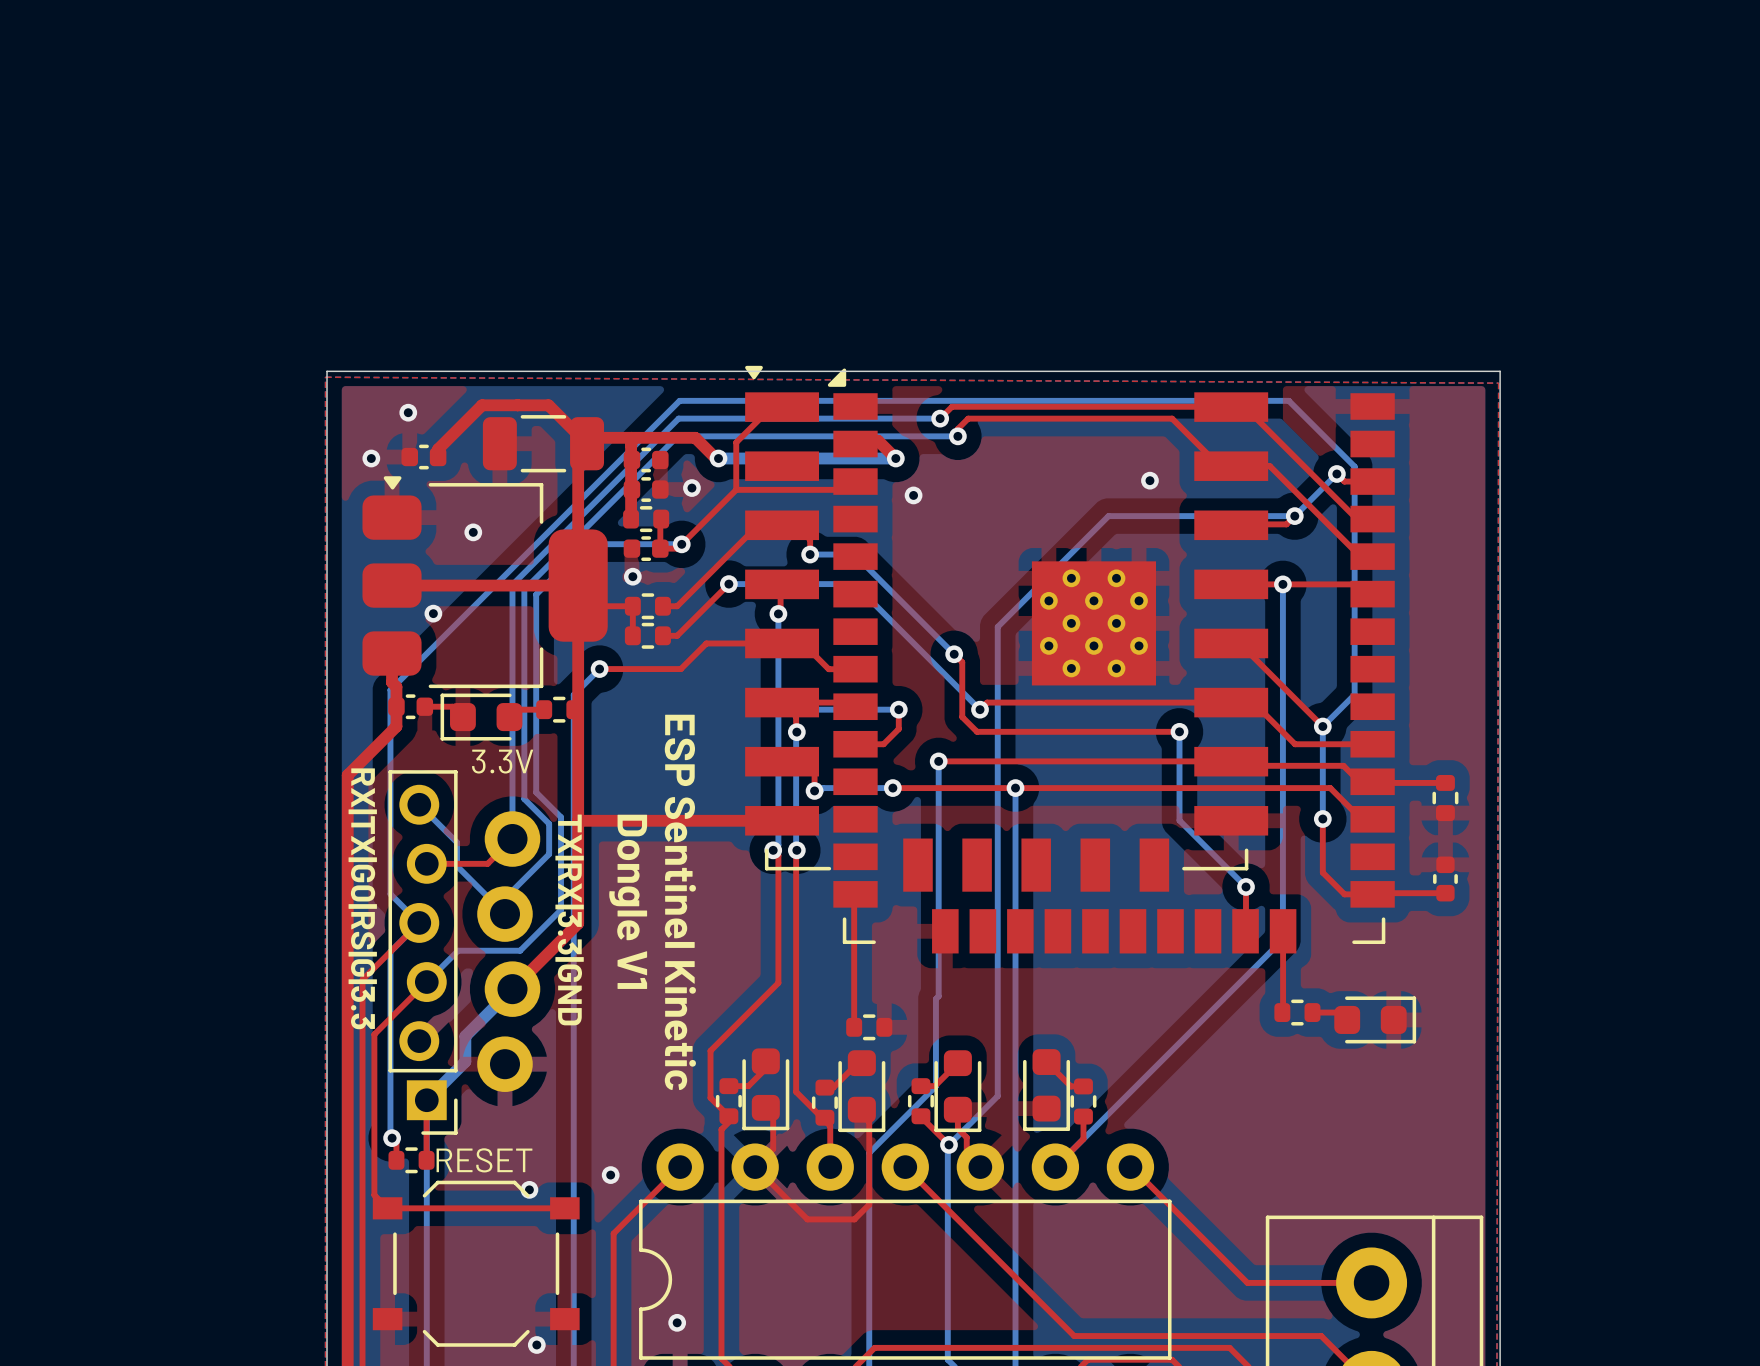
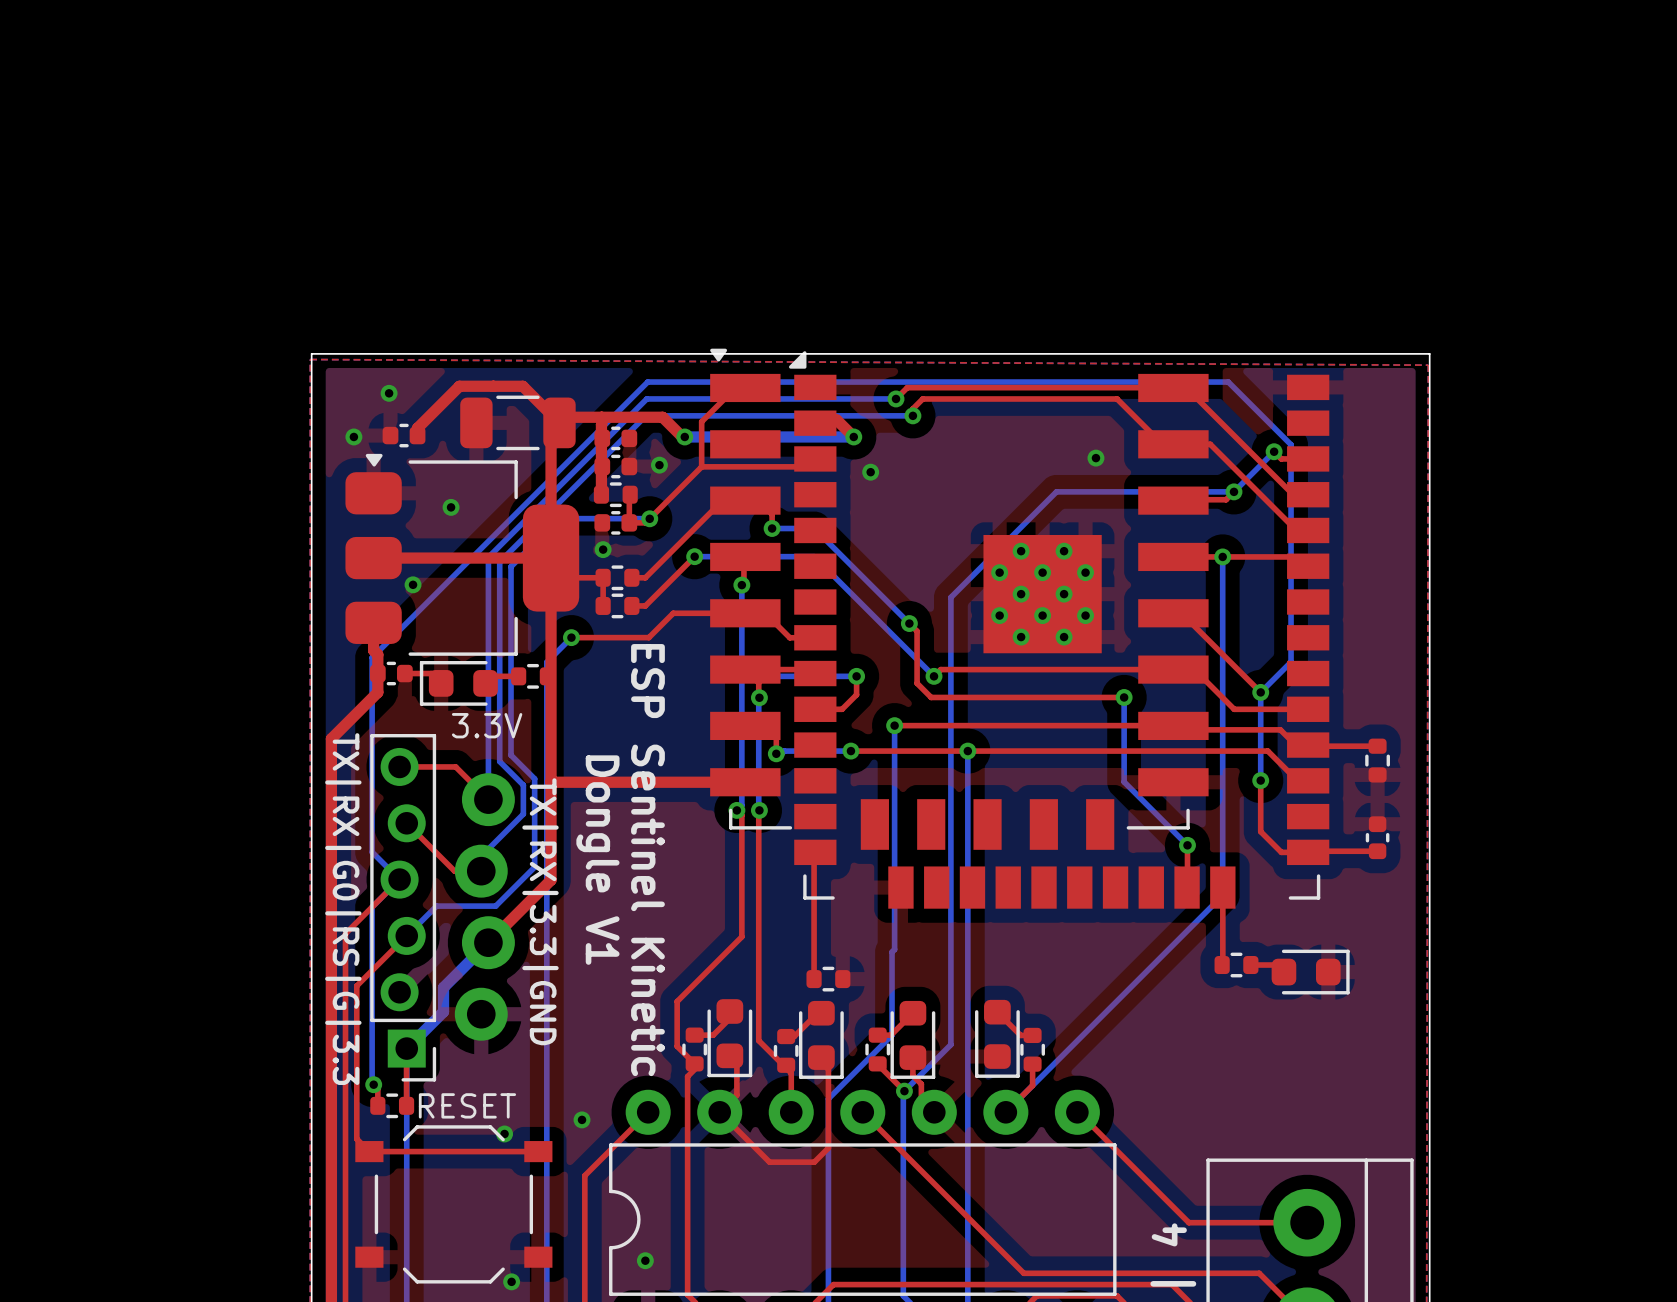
bottom track: (419, 804) (457, 842) (457, 866) (504, 914) -> none
top track: (512, 839) (487, 863) (426, 863) -> (488, 799) (455, 766) (399, 766)
top track: none -> (406, 823) (454, 871) (481, 871)
text: RX|TX|G0|RS|G|3.3 (362, 898) -> TX|RX|G0|RS|G|3.3 (343, 909)

